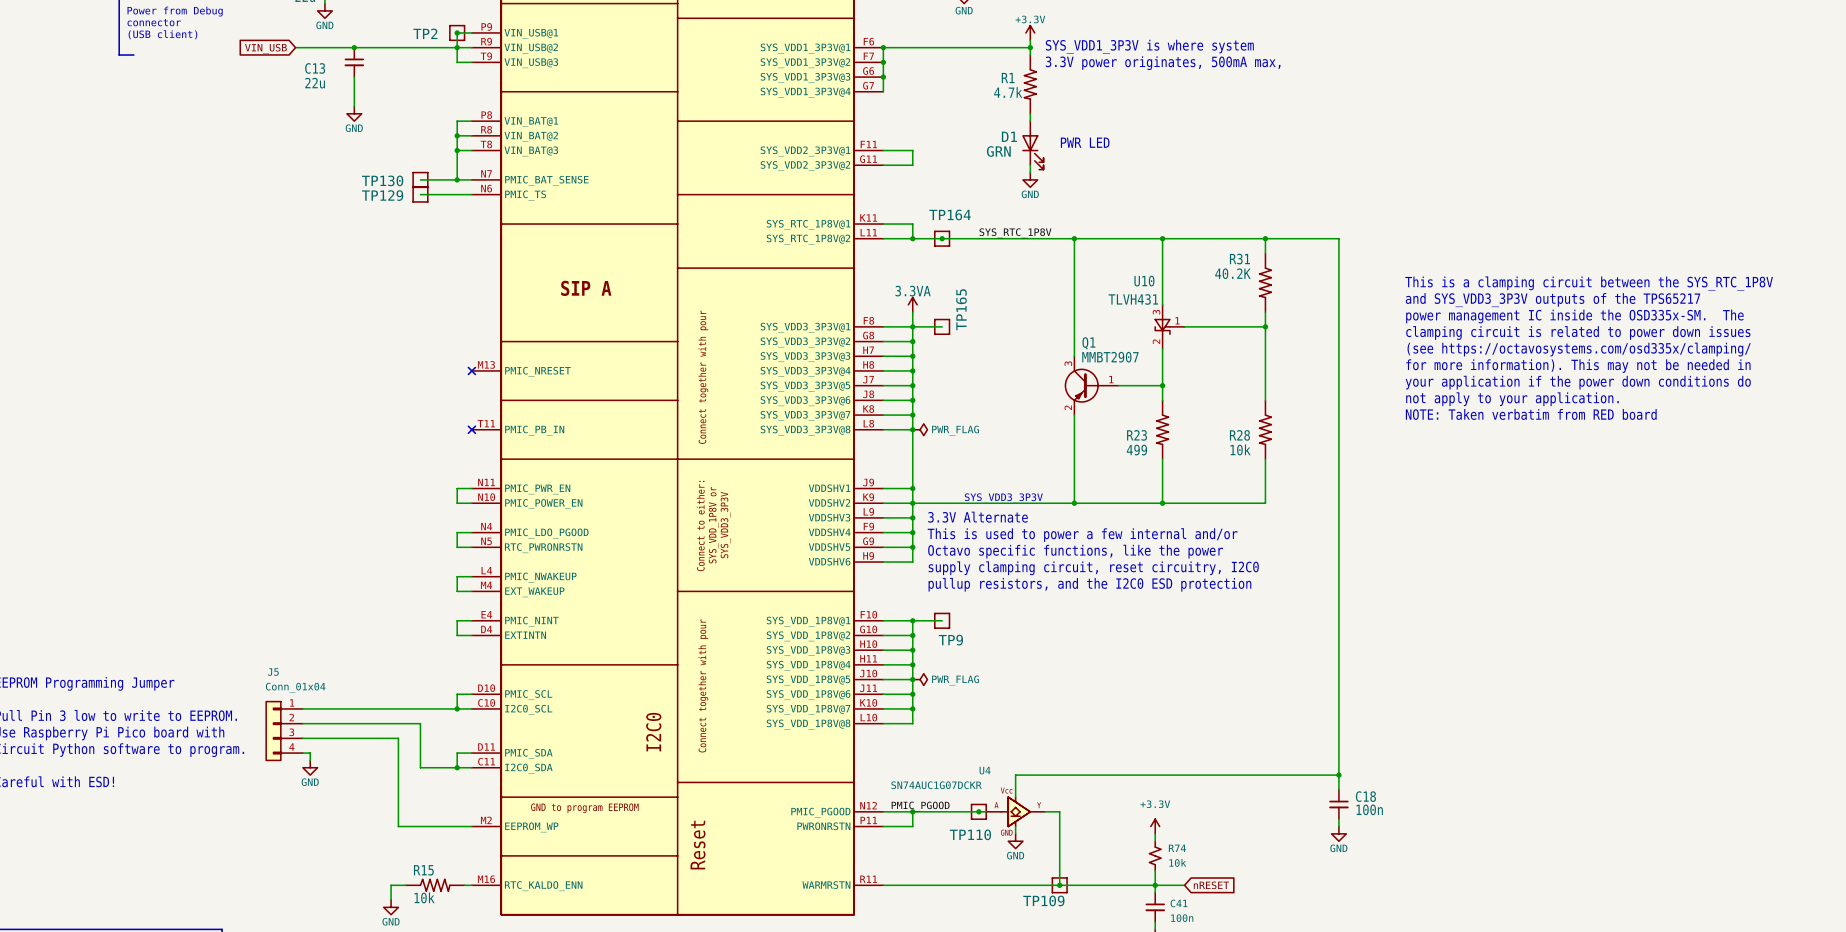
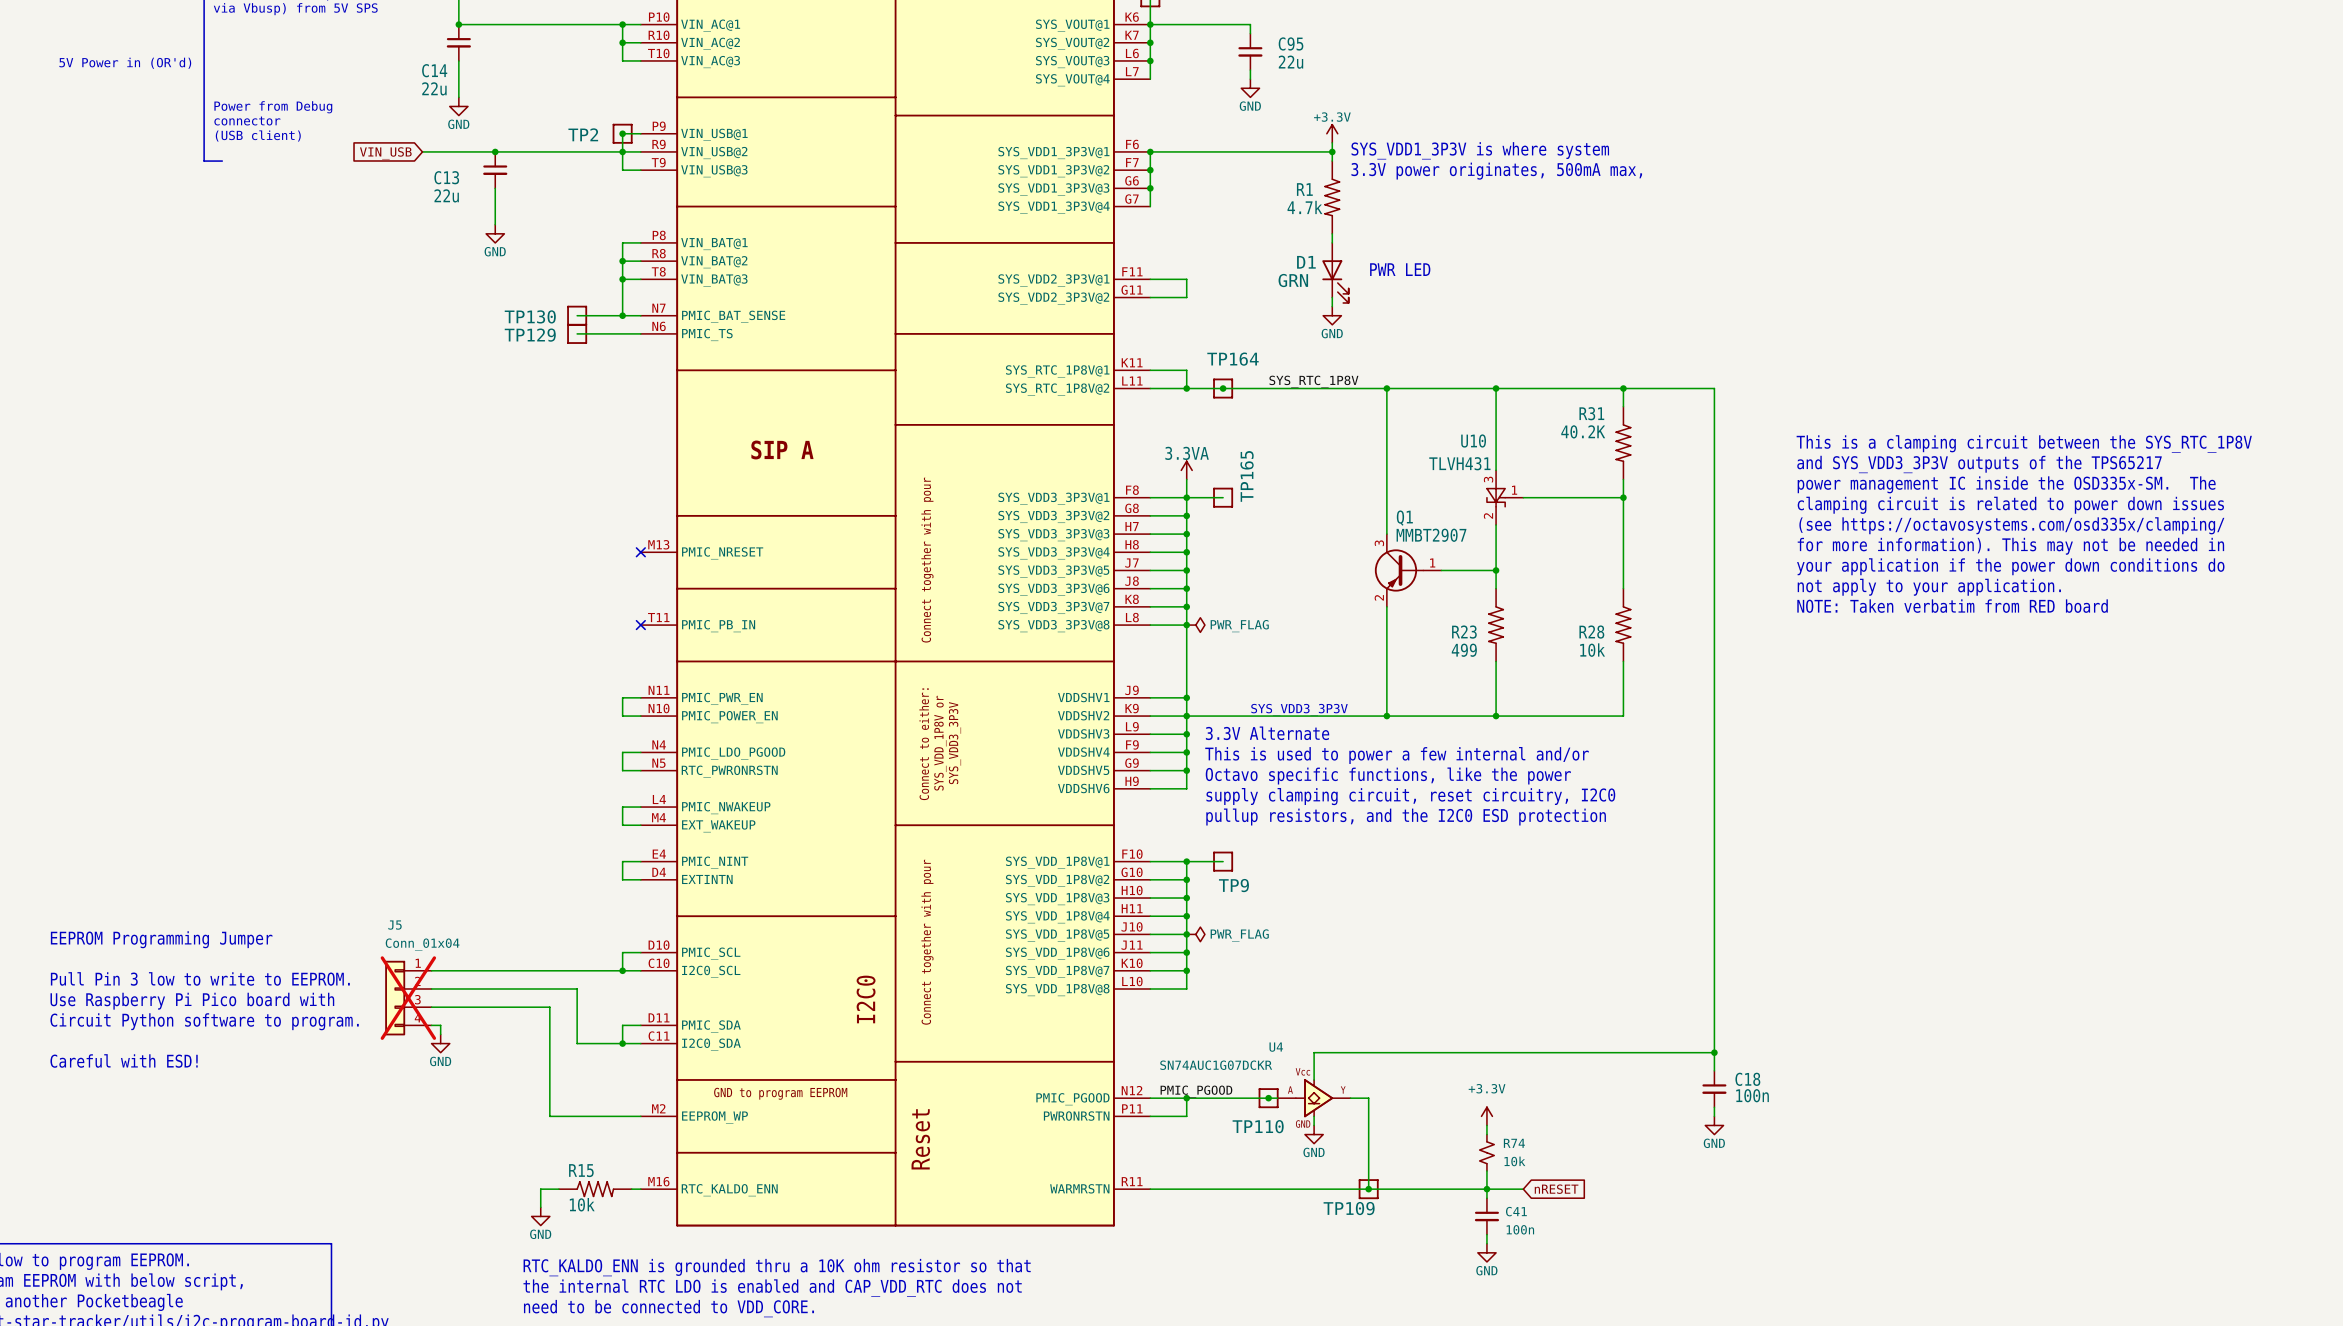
J5 do-not-place cross: none -> (408, 998)

